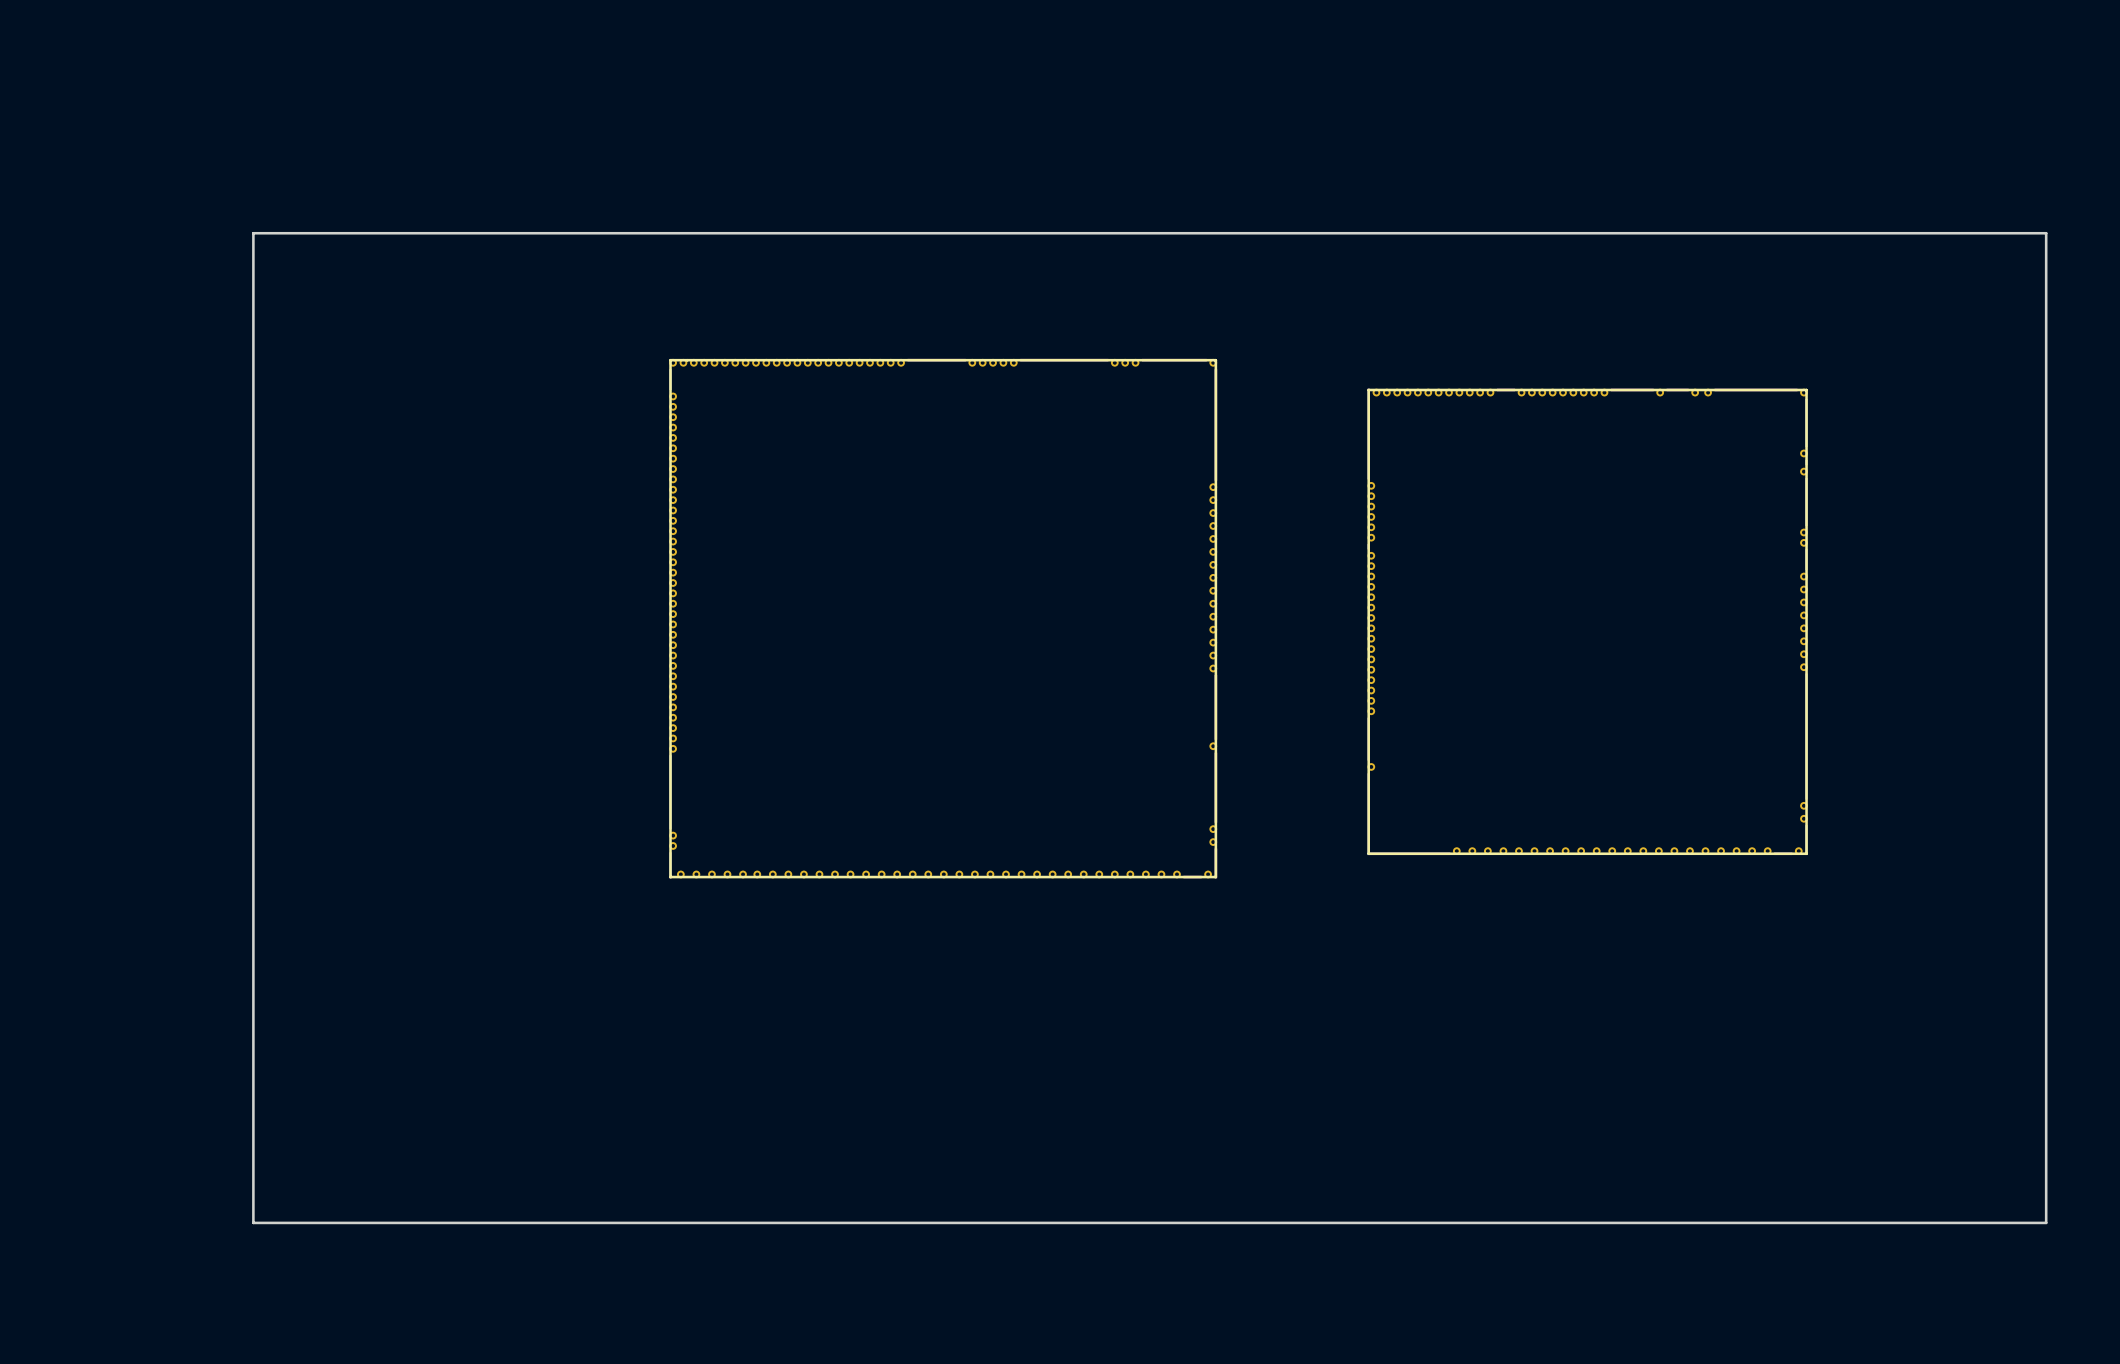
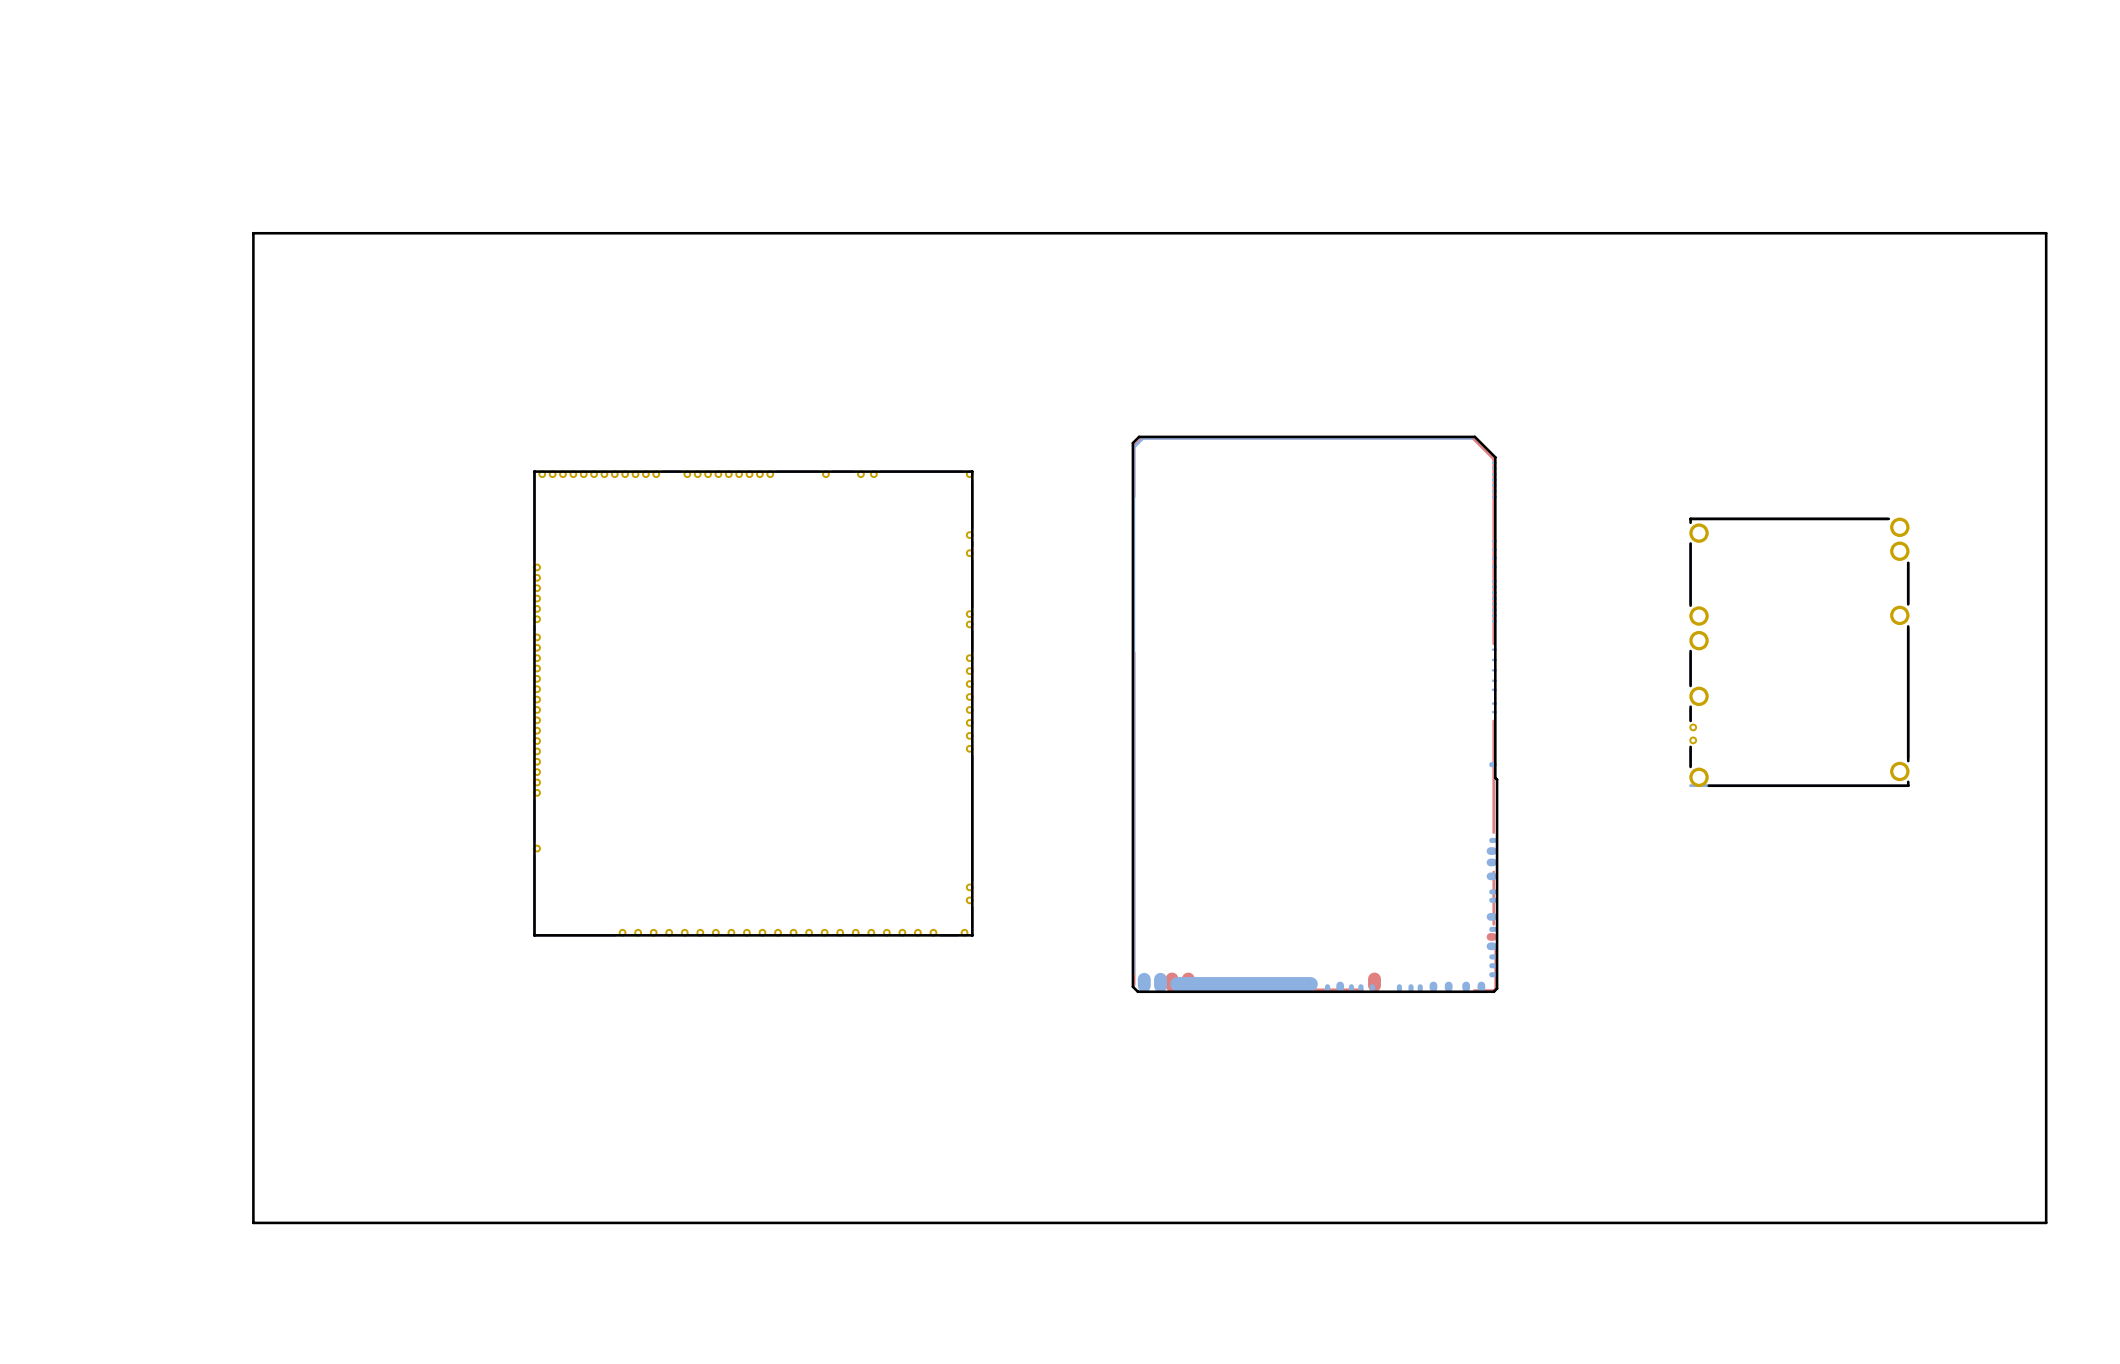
part: (943, 618) -> none
part: (1587, 621) -> none
part: none -> (1799, 652)
part: none -> (753, 703)
part: none -> (1314, 714)

